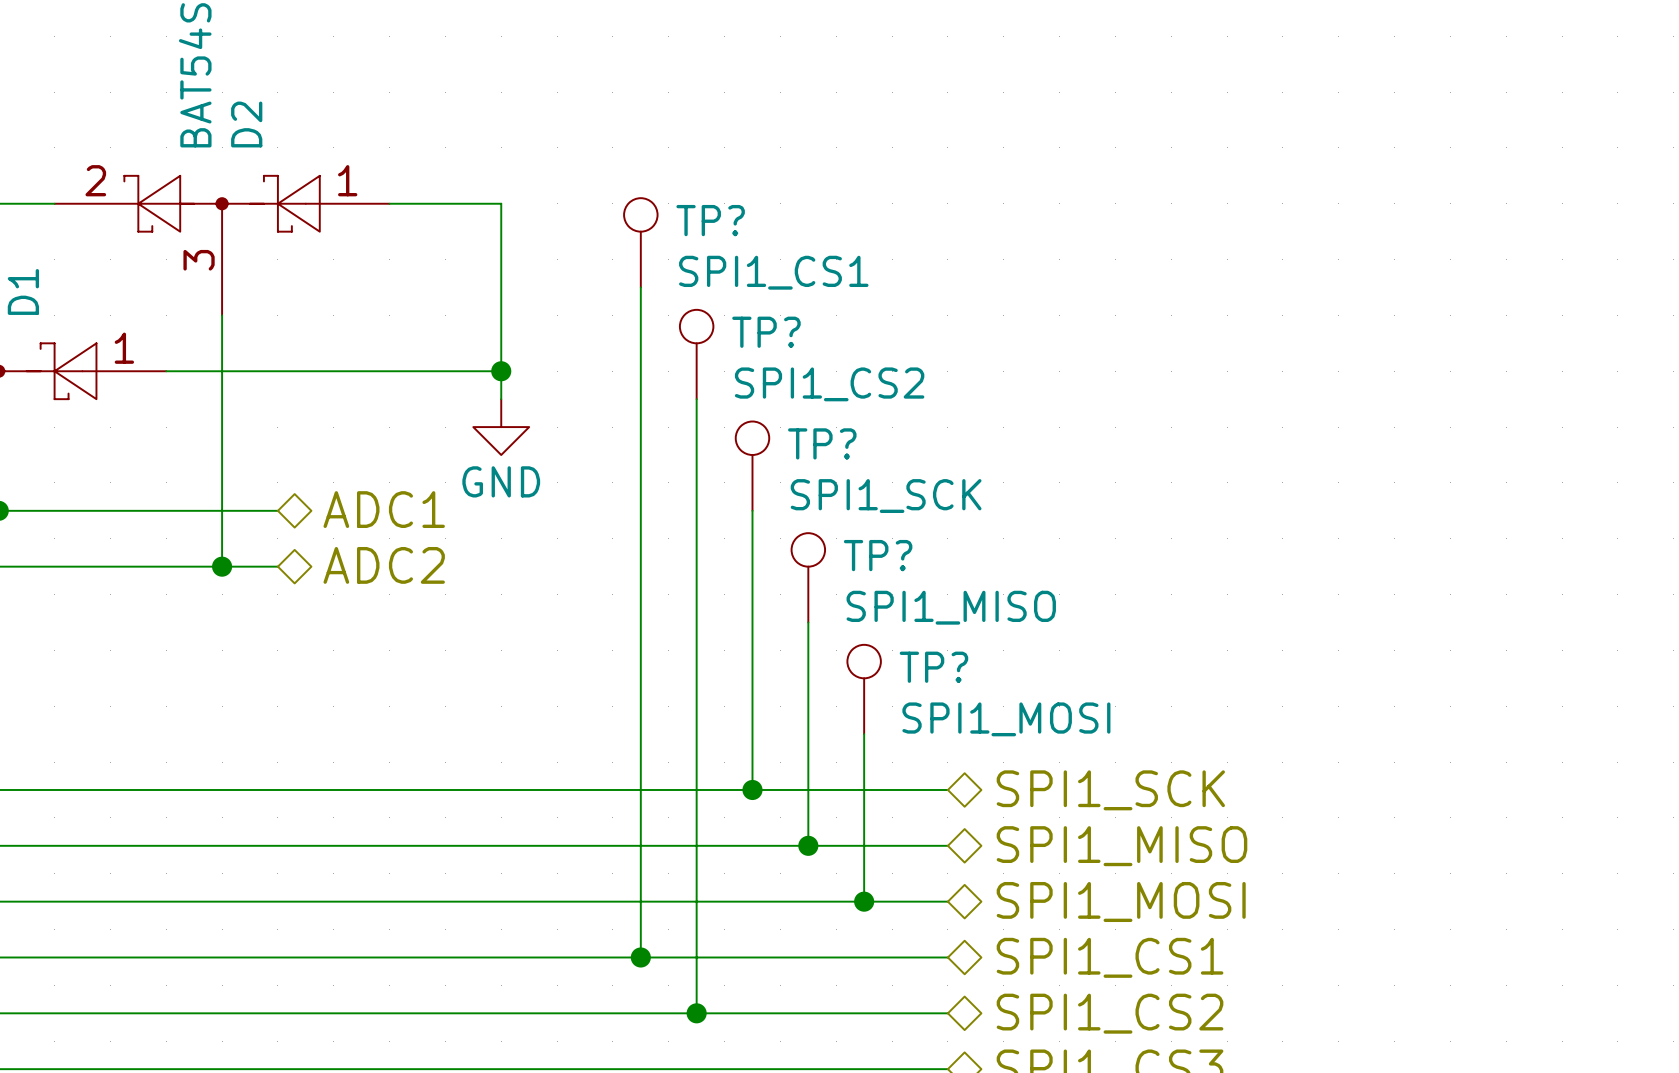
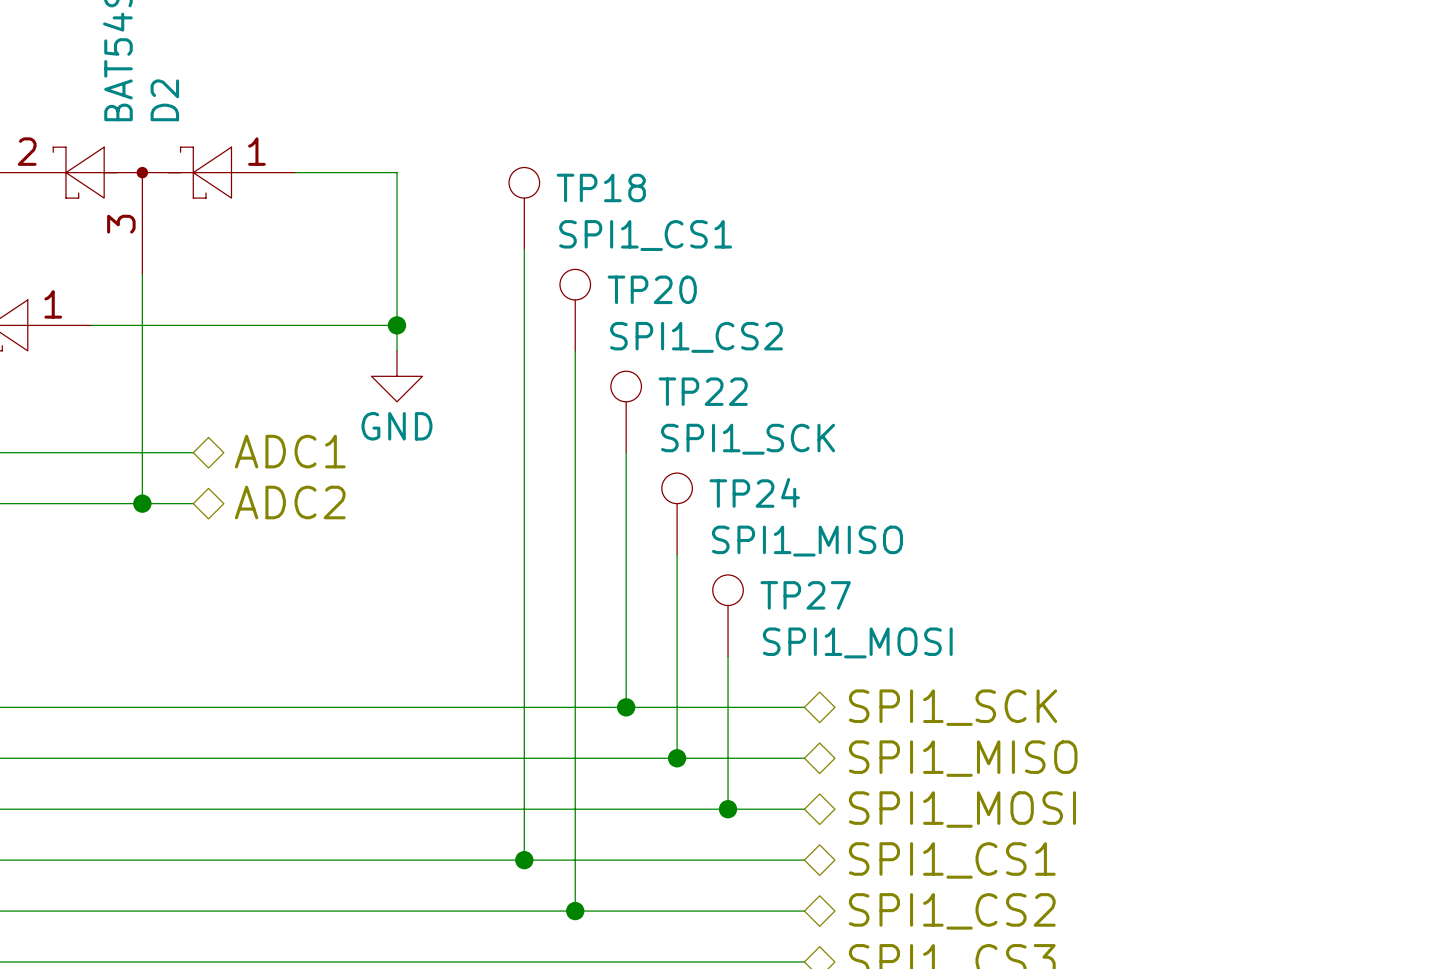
TP? name: TP? (710, 220) -> TP18 (601, 187)
TP? name: TP? (766, 332) -> TP20 (652, 289)
TP? name: TP? (822, 443) -> TP22 (703, 391)
TP? name: TP? (878, 555) -> TP24 (754, 492)
TP? name: TP? (933, 667) -> TP27 (805, 595)

